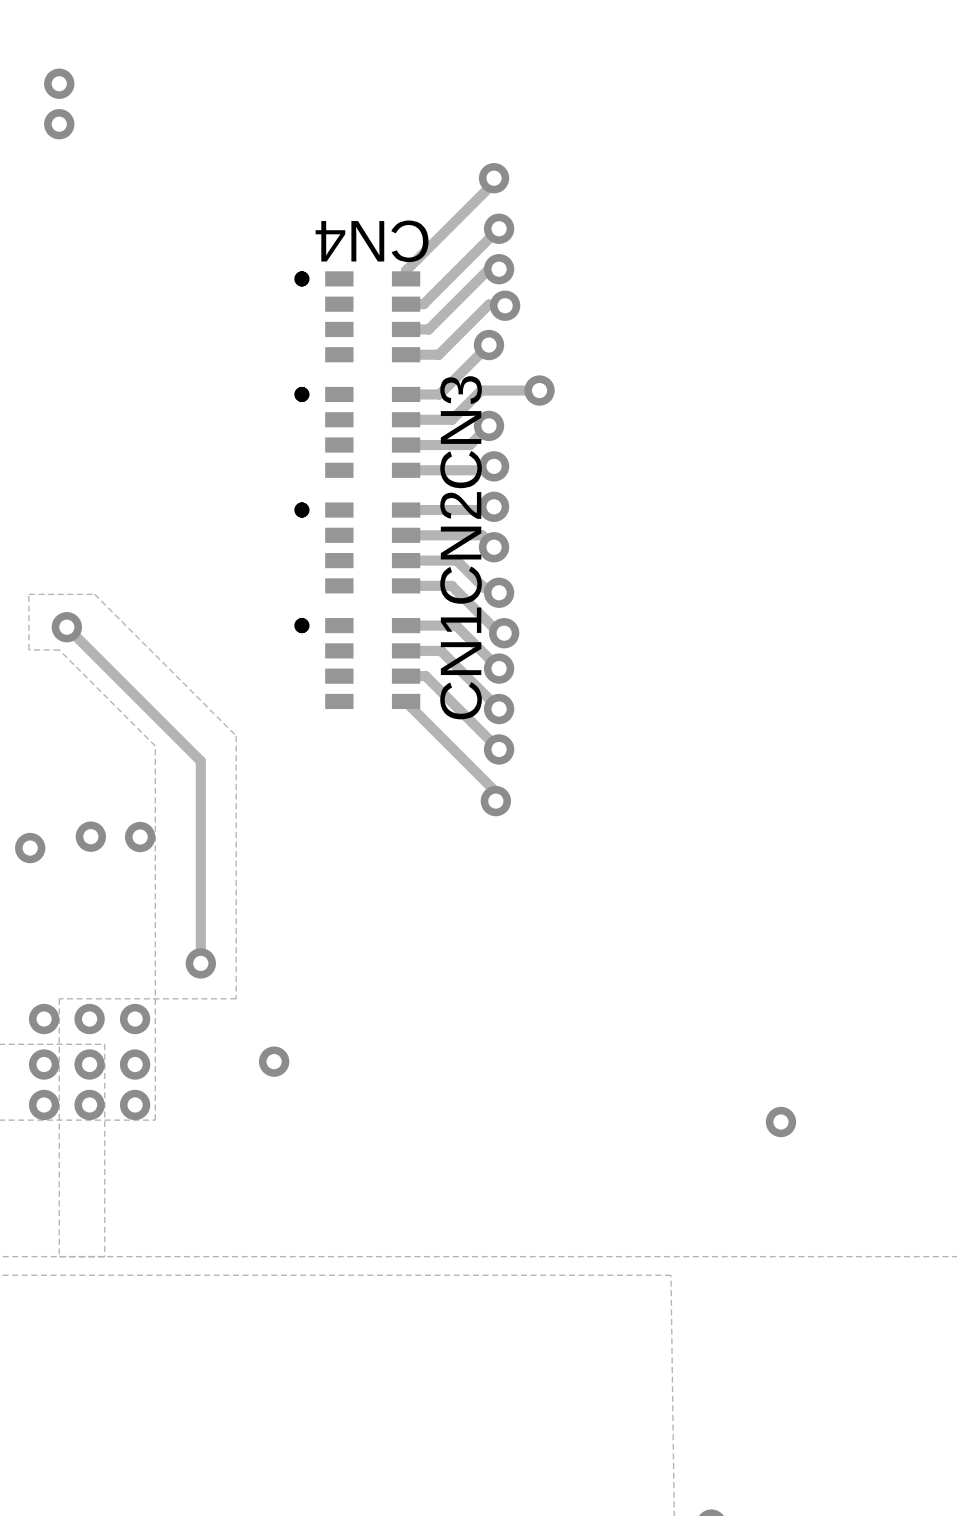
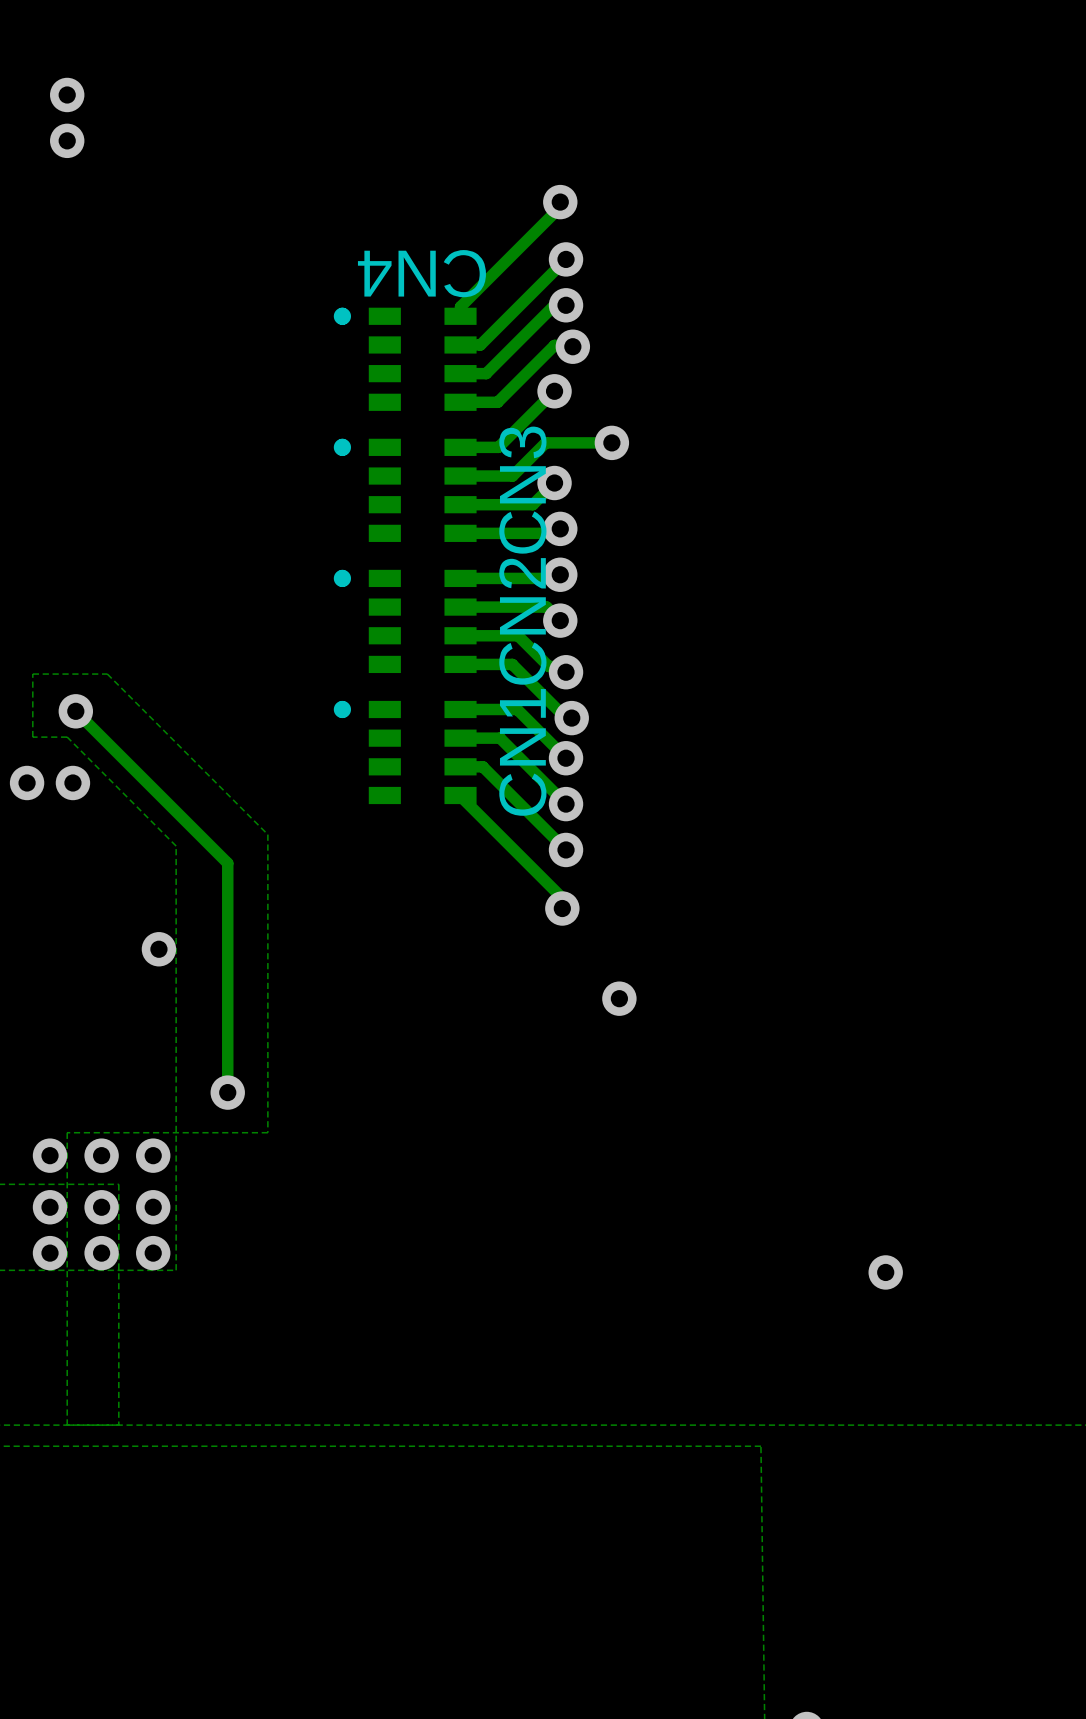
via: none -> (27, 782)
via: none -> (72, 782)
via: (90, 836) -> none
via: (30, 848) -> none
via: none -> (619, 998)
via: (274, 1061) -> none

